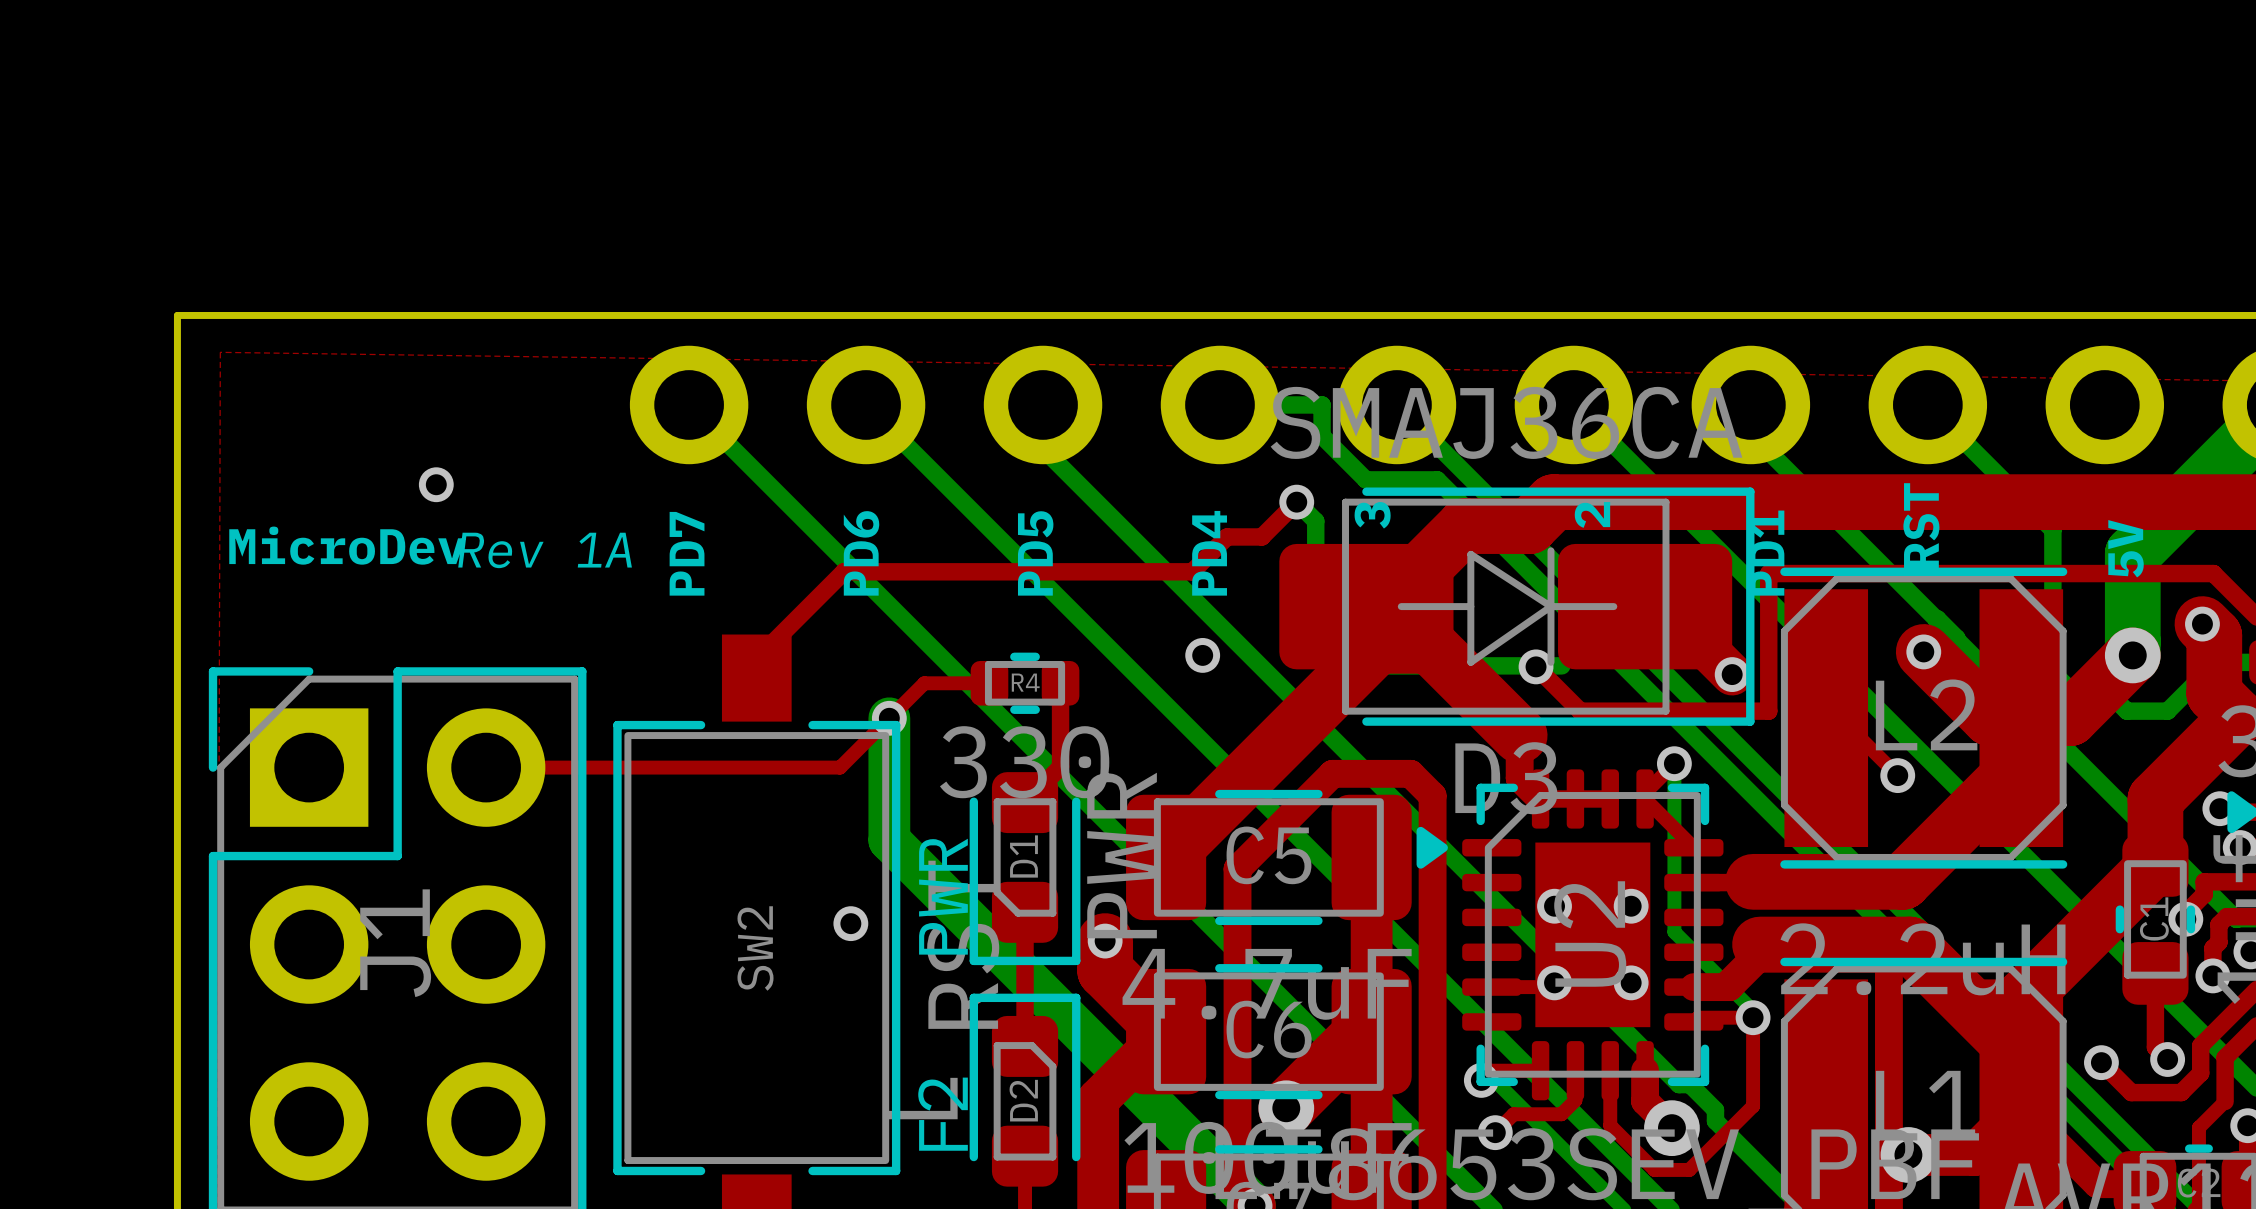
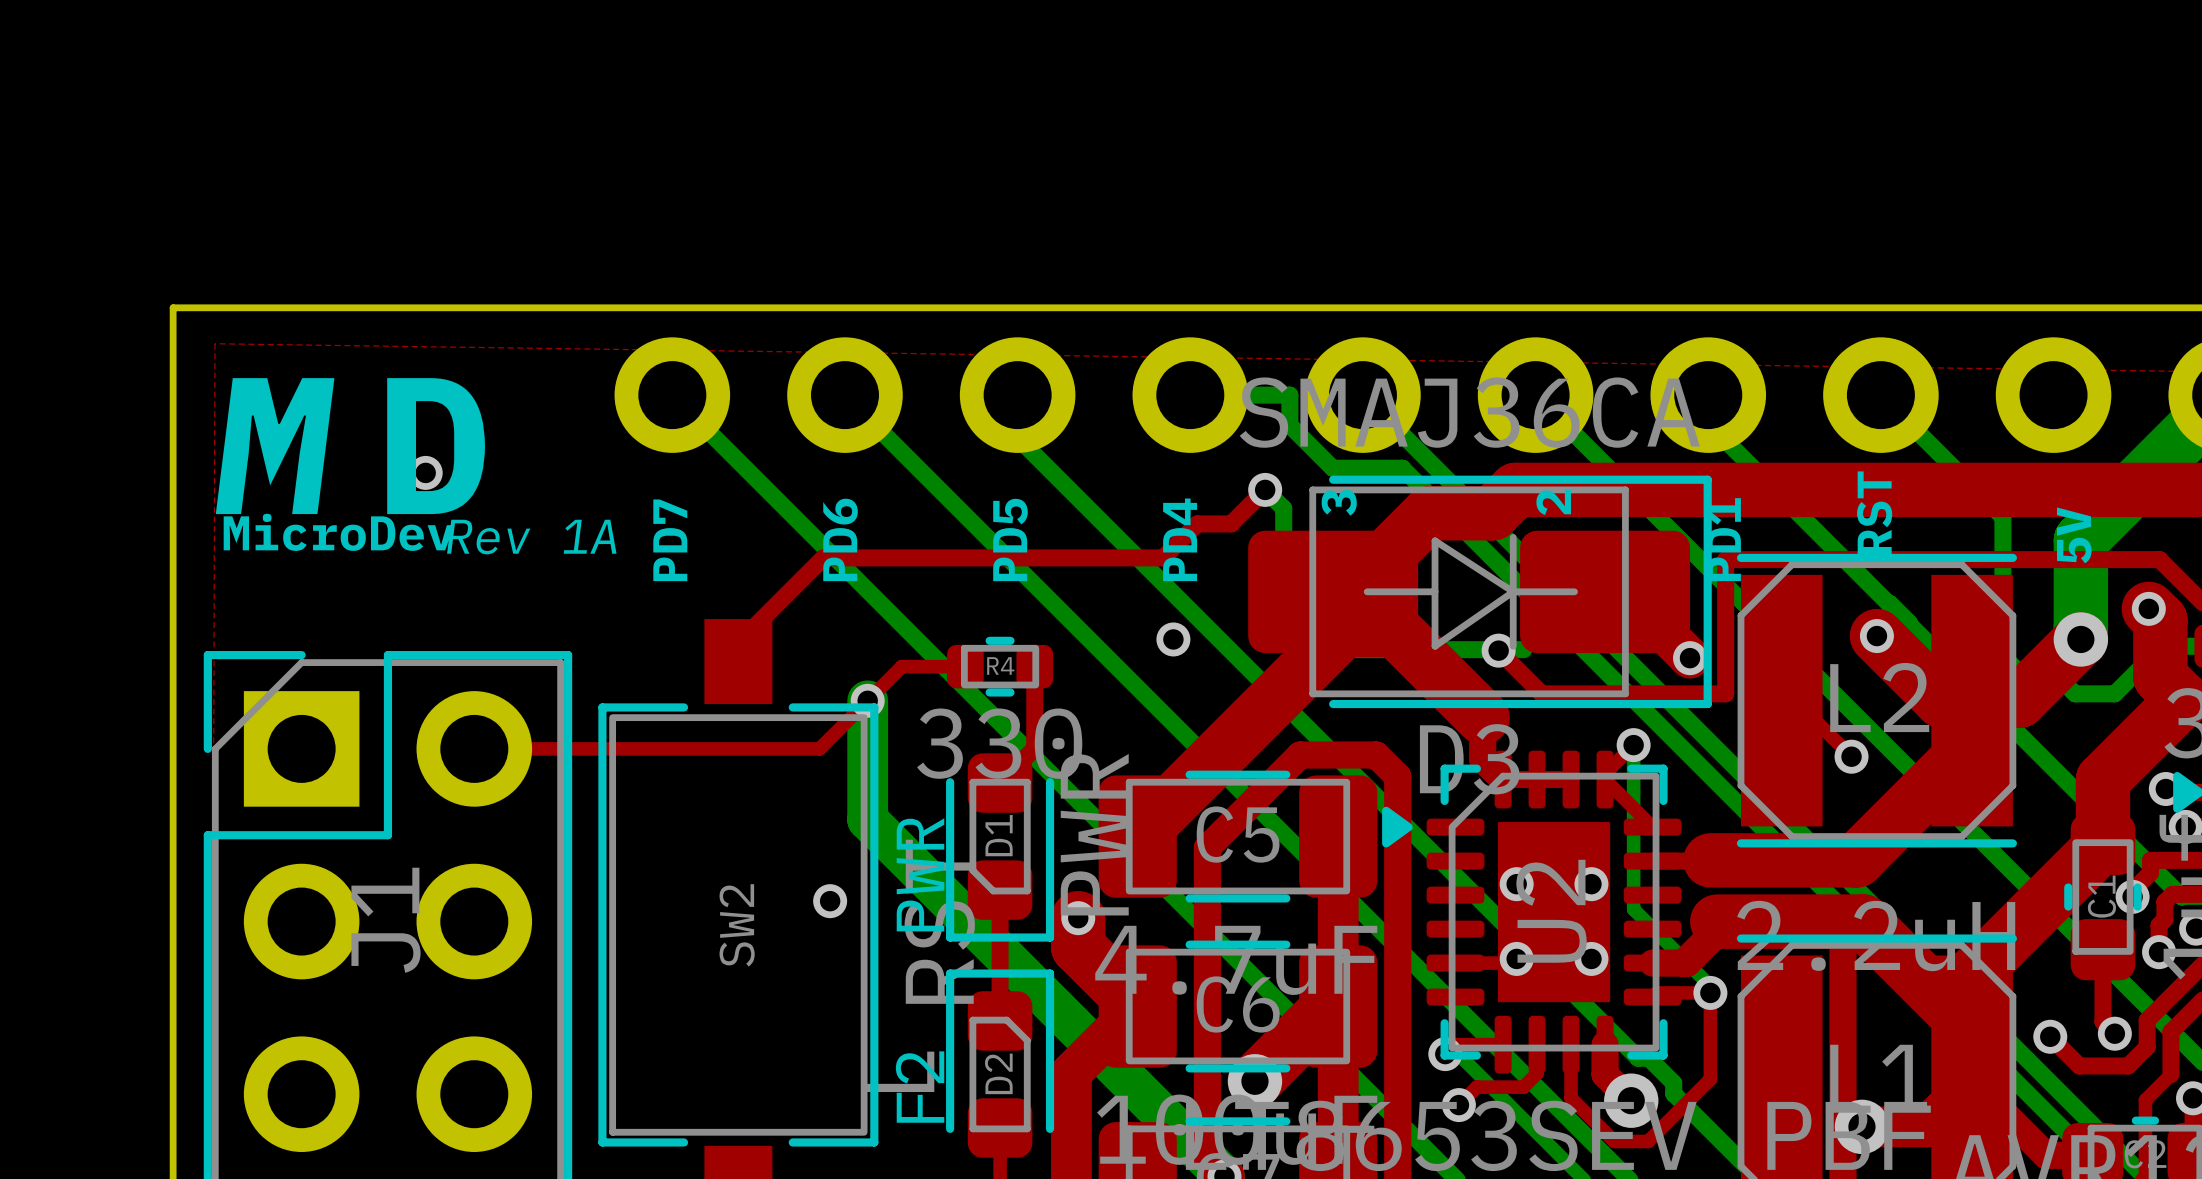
text: none -> M (275, 446)
text: none -> D (436, 446)

